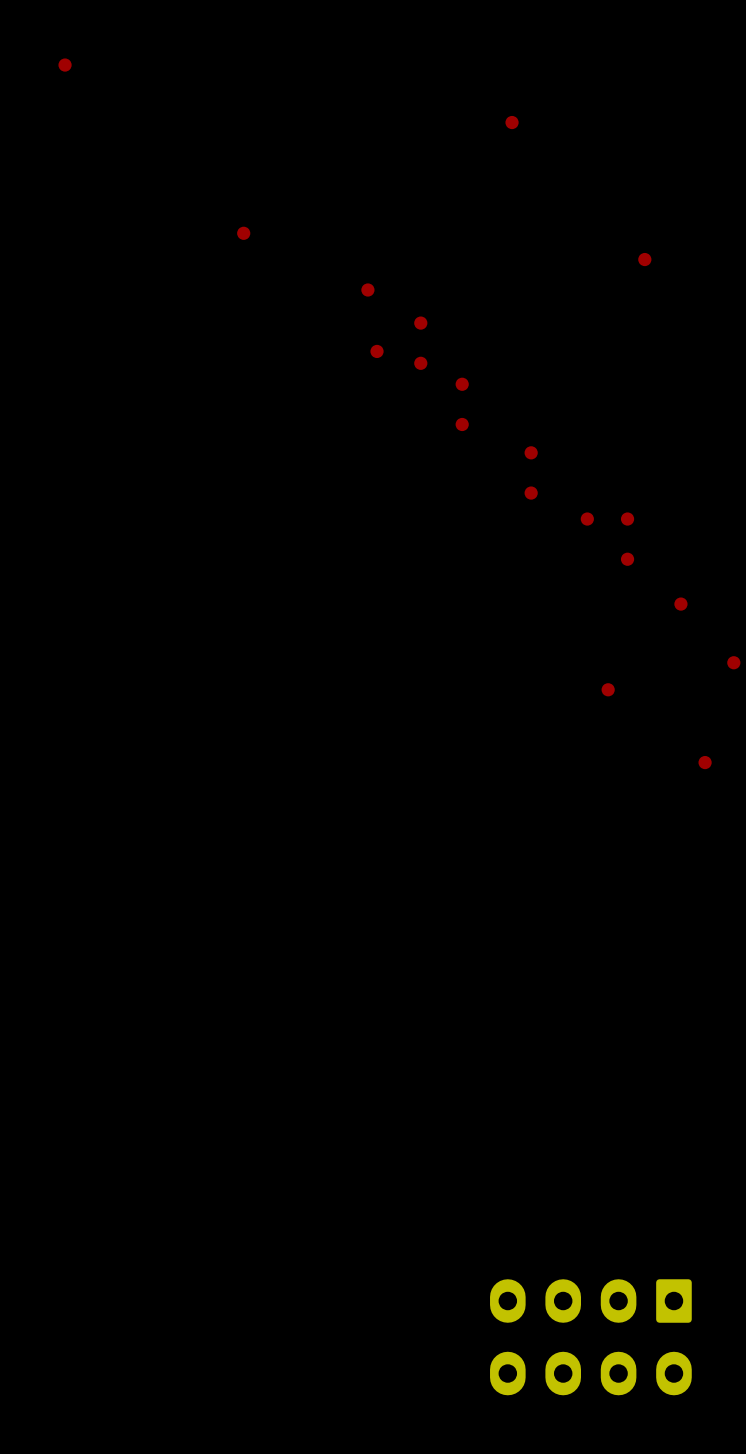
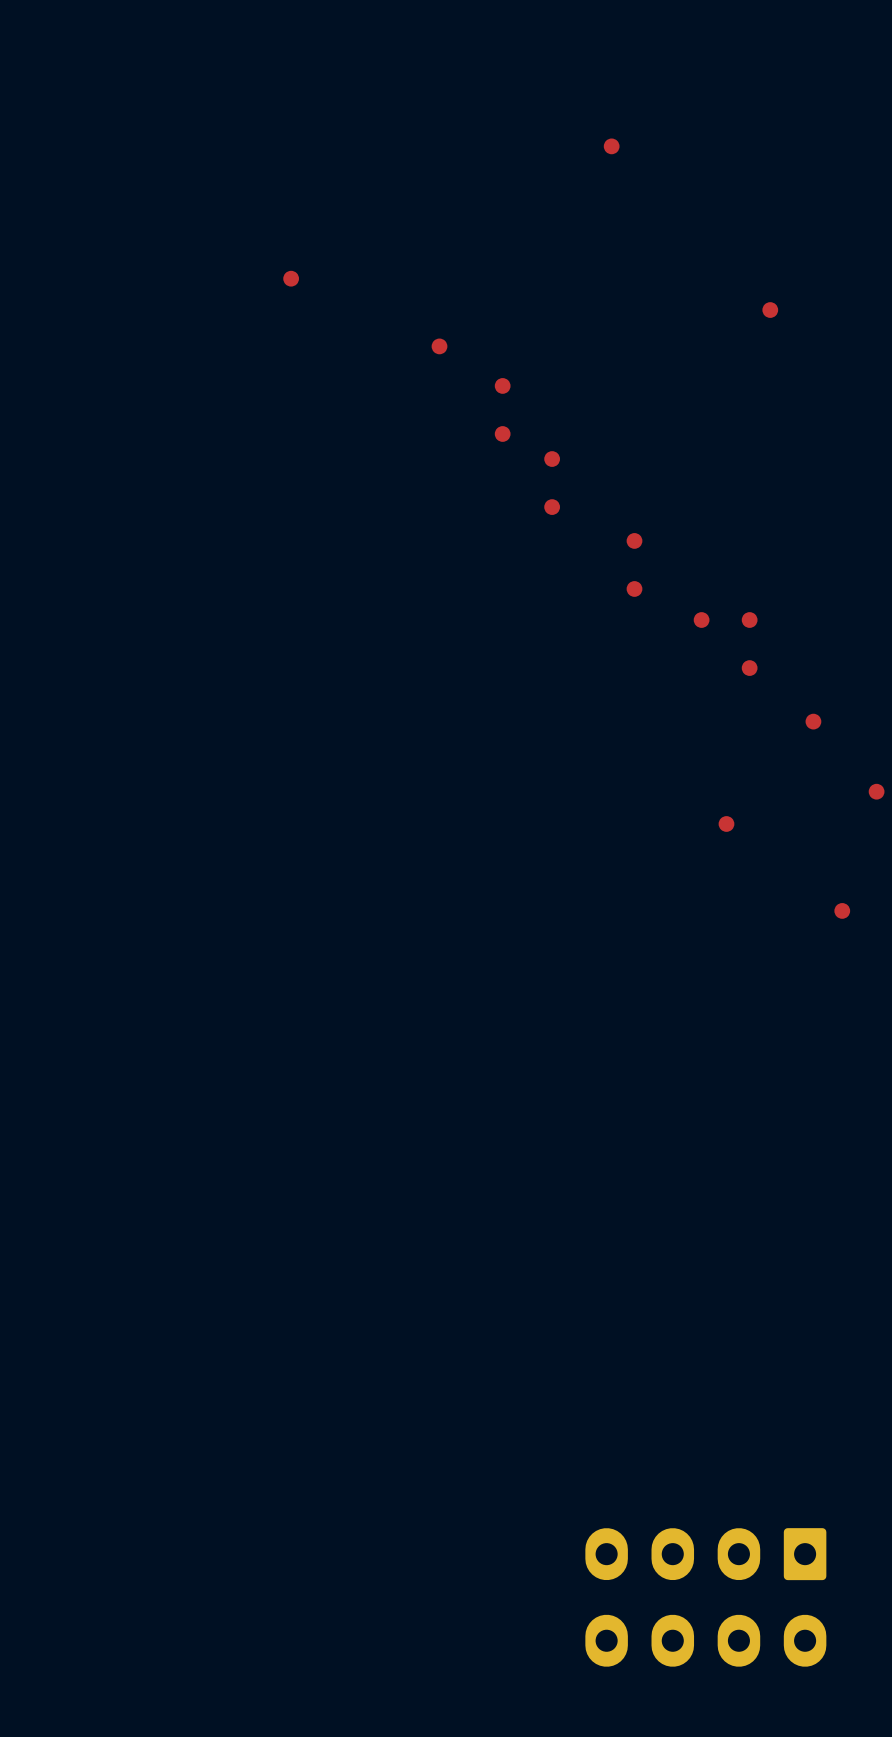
part: (65, 65) -> none
part: (377, 351) -> none

